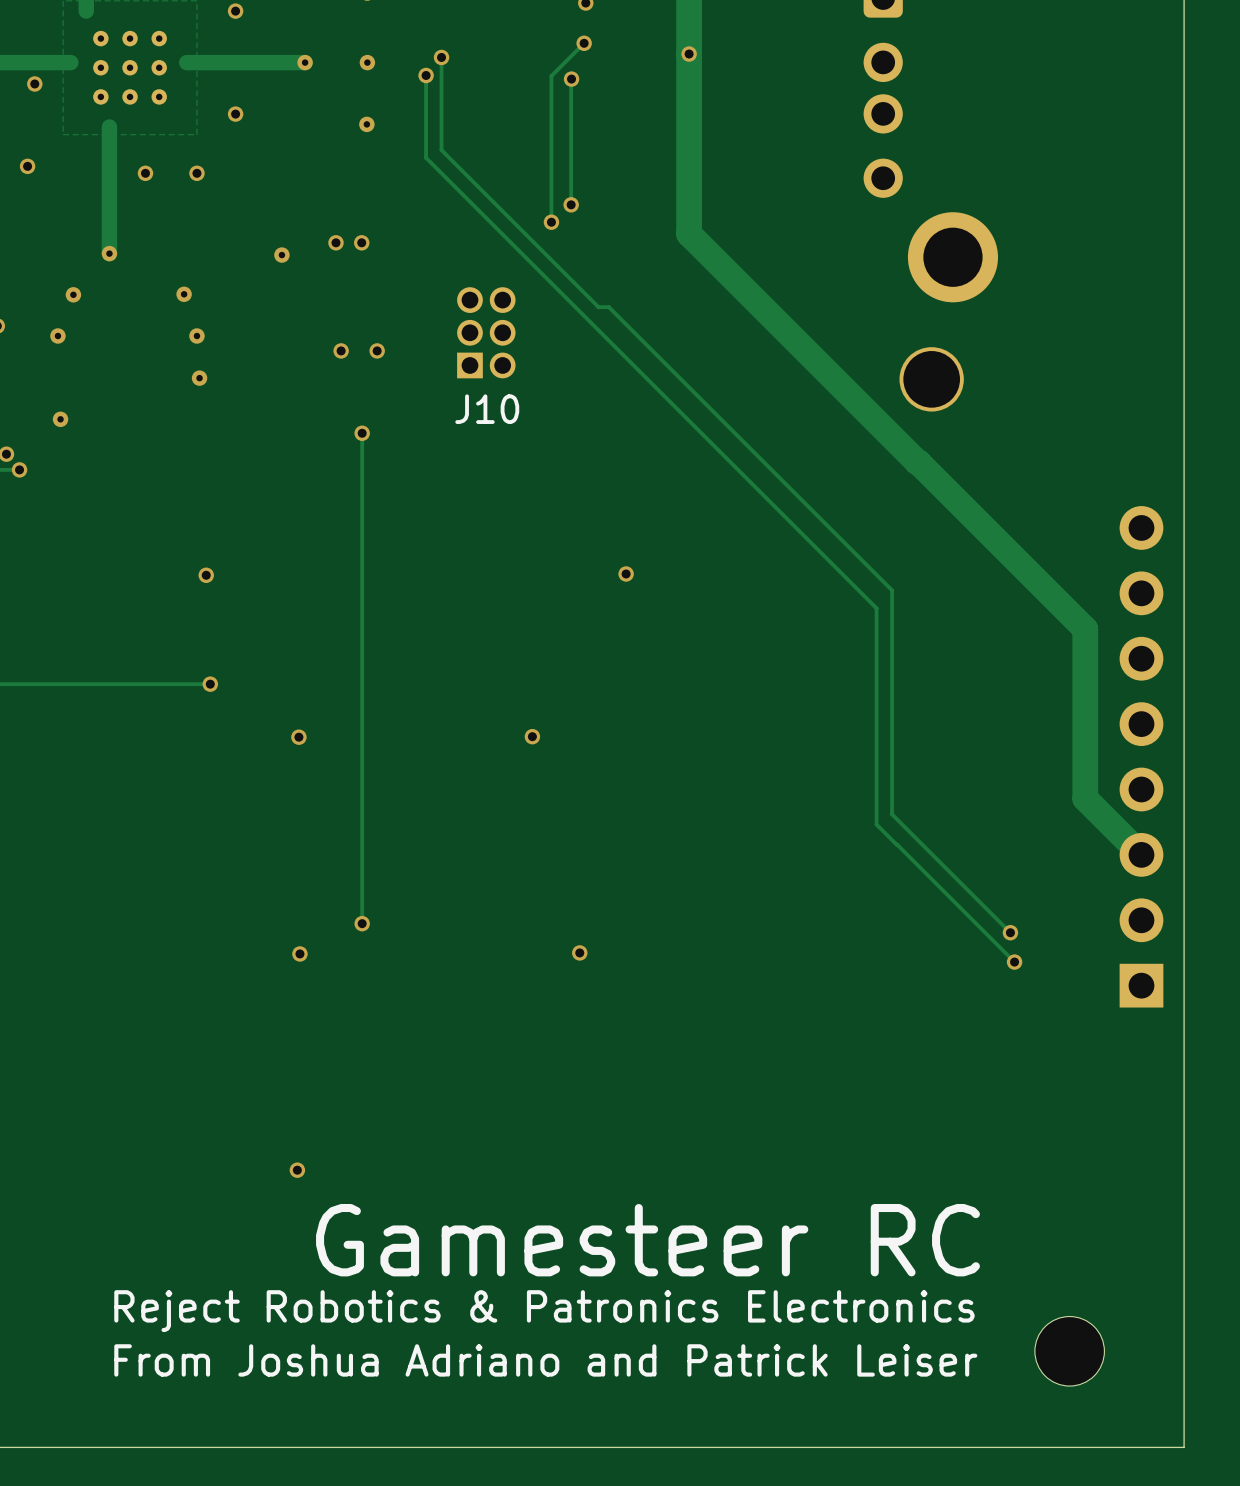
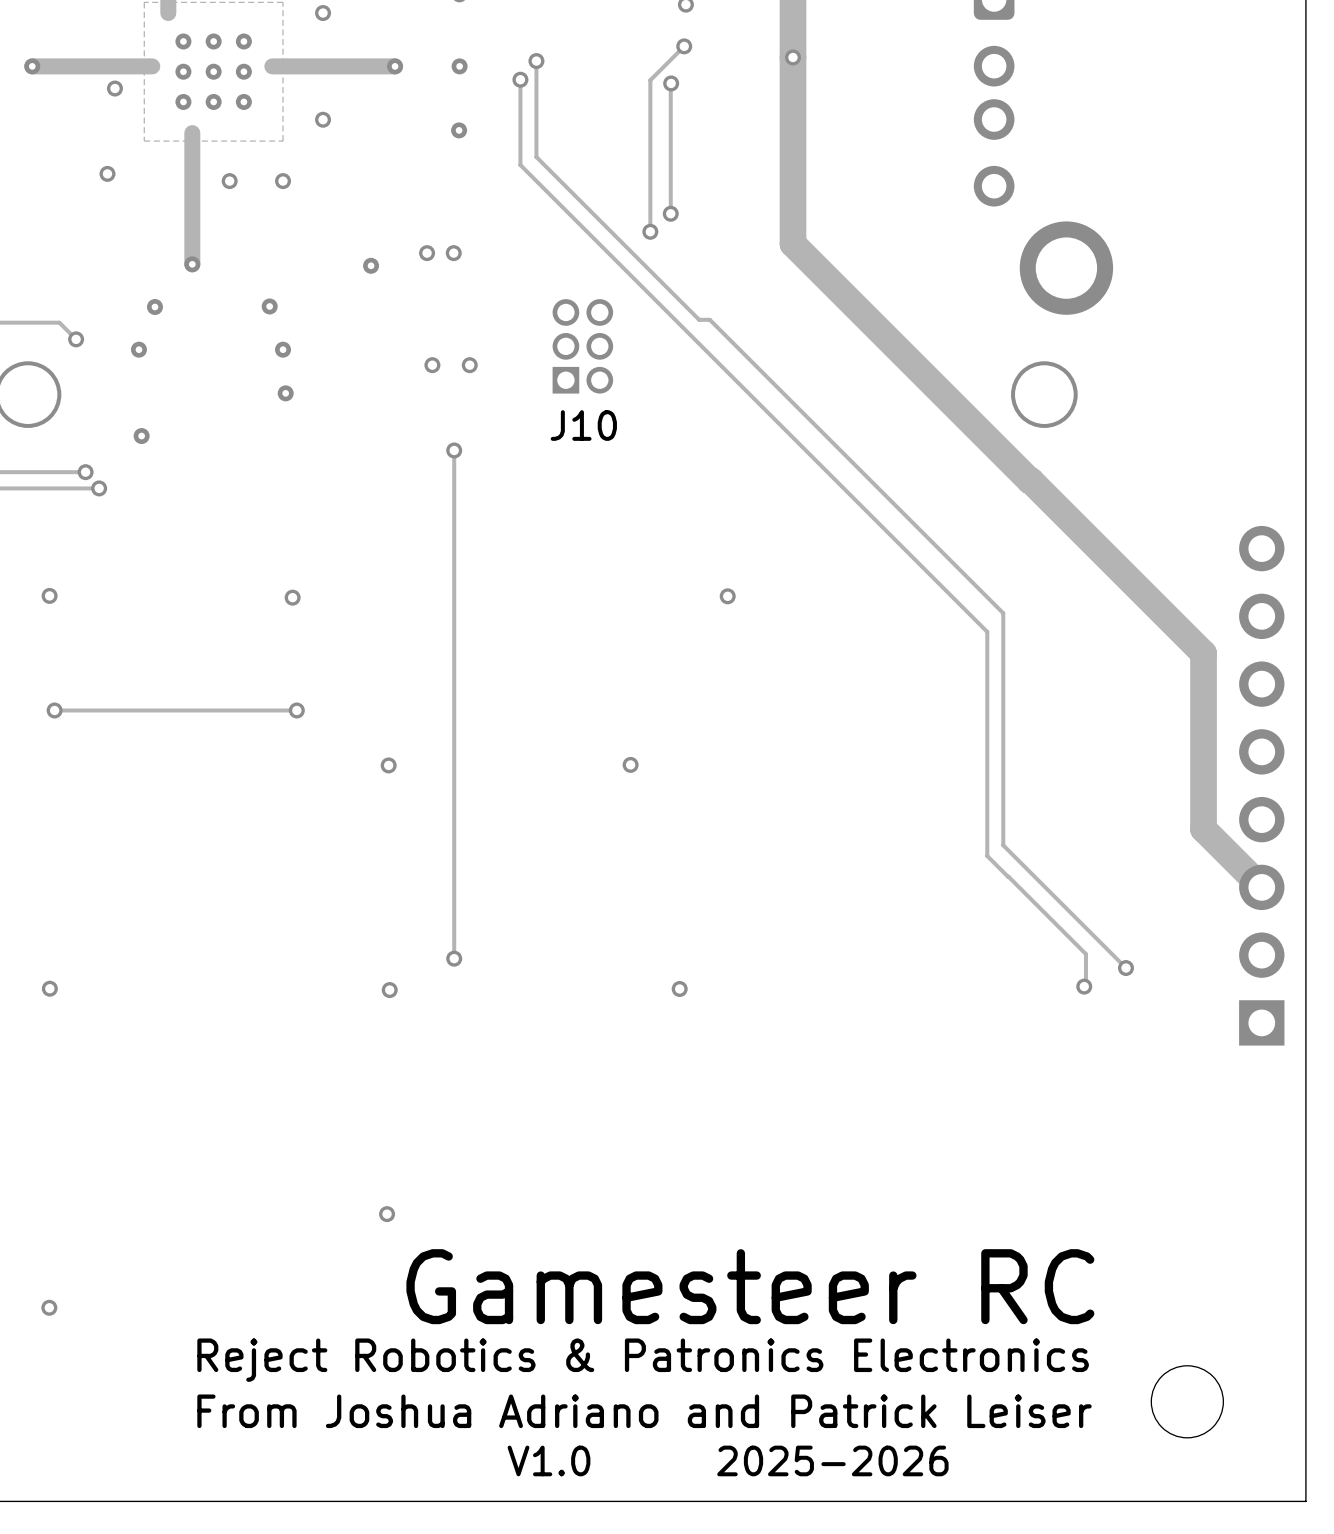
track: (971, 919) (1014, 962) -> (1085, 954) (1085, 984)
via position: (1014, 962) -> (1084, 986)
text: none -> V1.0 2025-2026 (728, 1460)

